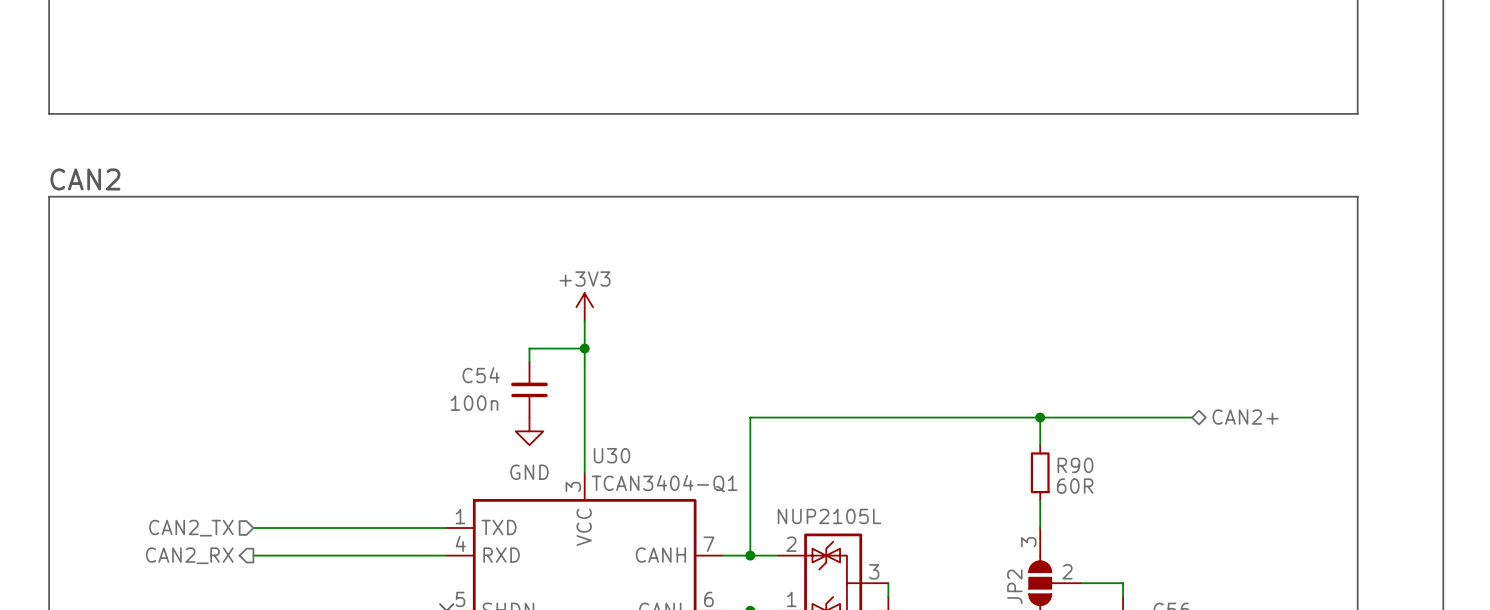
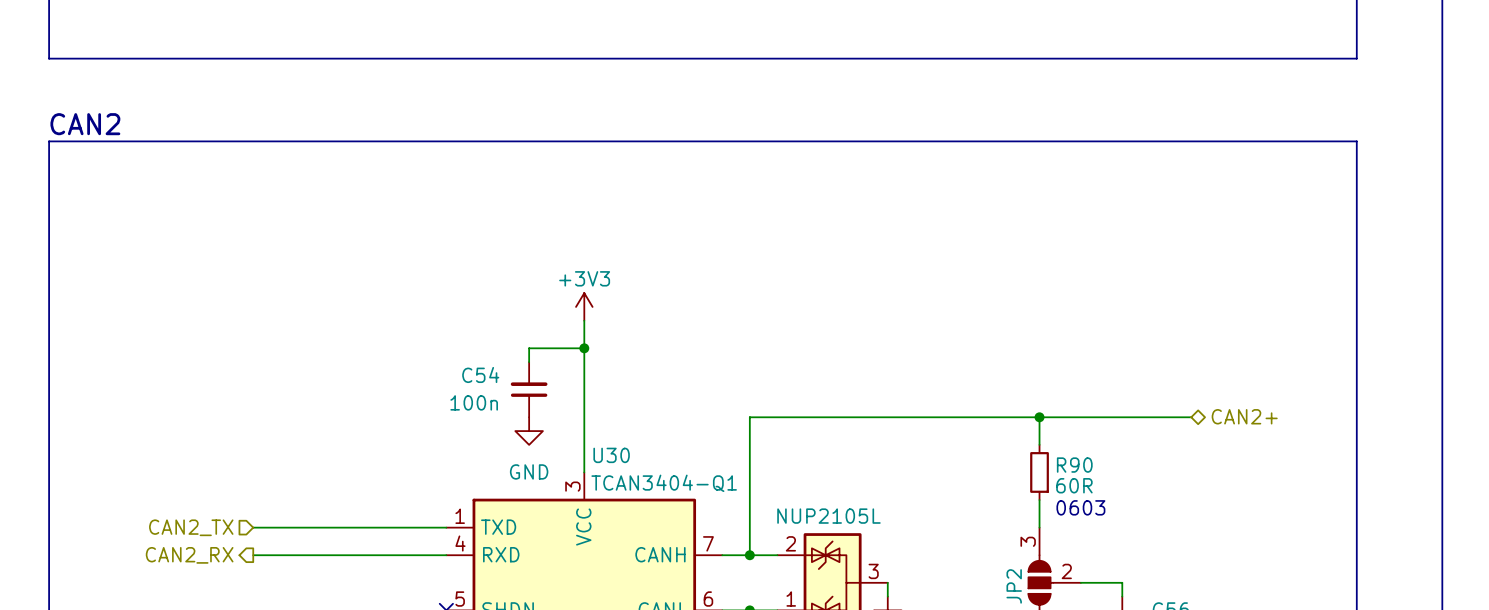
line: (49, 58) (49, 113) (1357, 113) (1357, 58) -> (49, 58) (1356, 58)
text position: CAN2 (85, 179) -> CAN2 (85, 124)
line: (49, 196) (1357, 196) -> (49, 196) (49, 141) (1356, 141) (1356, 196)
text: none -> 0603 (1080, 507)

